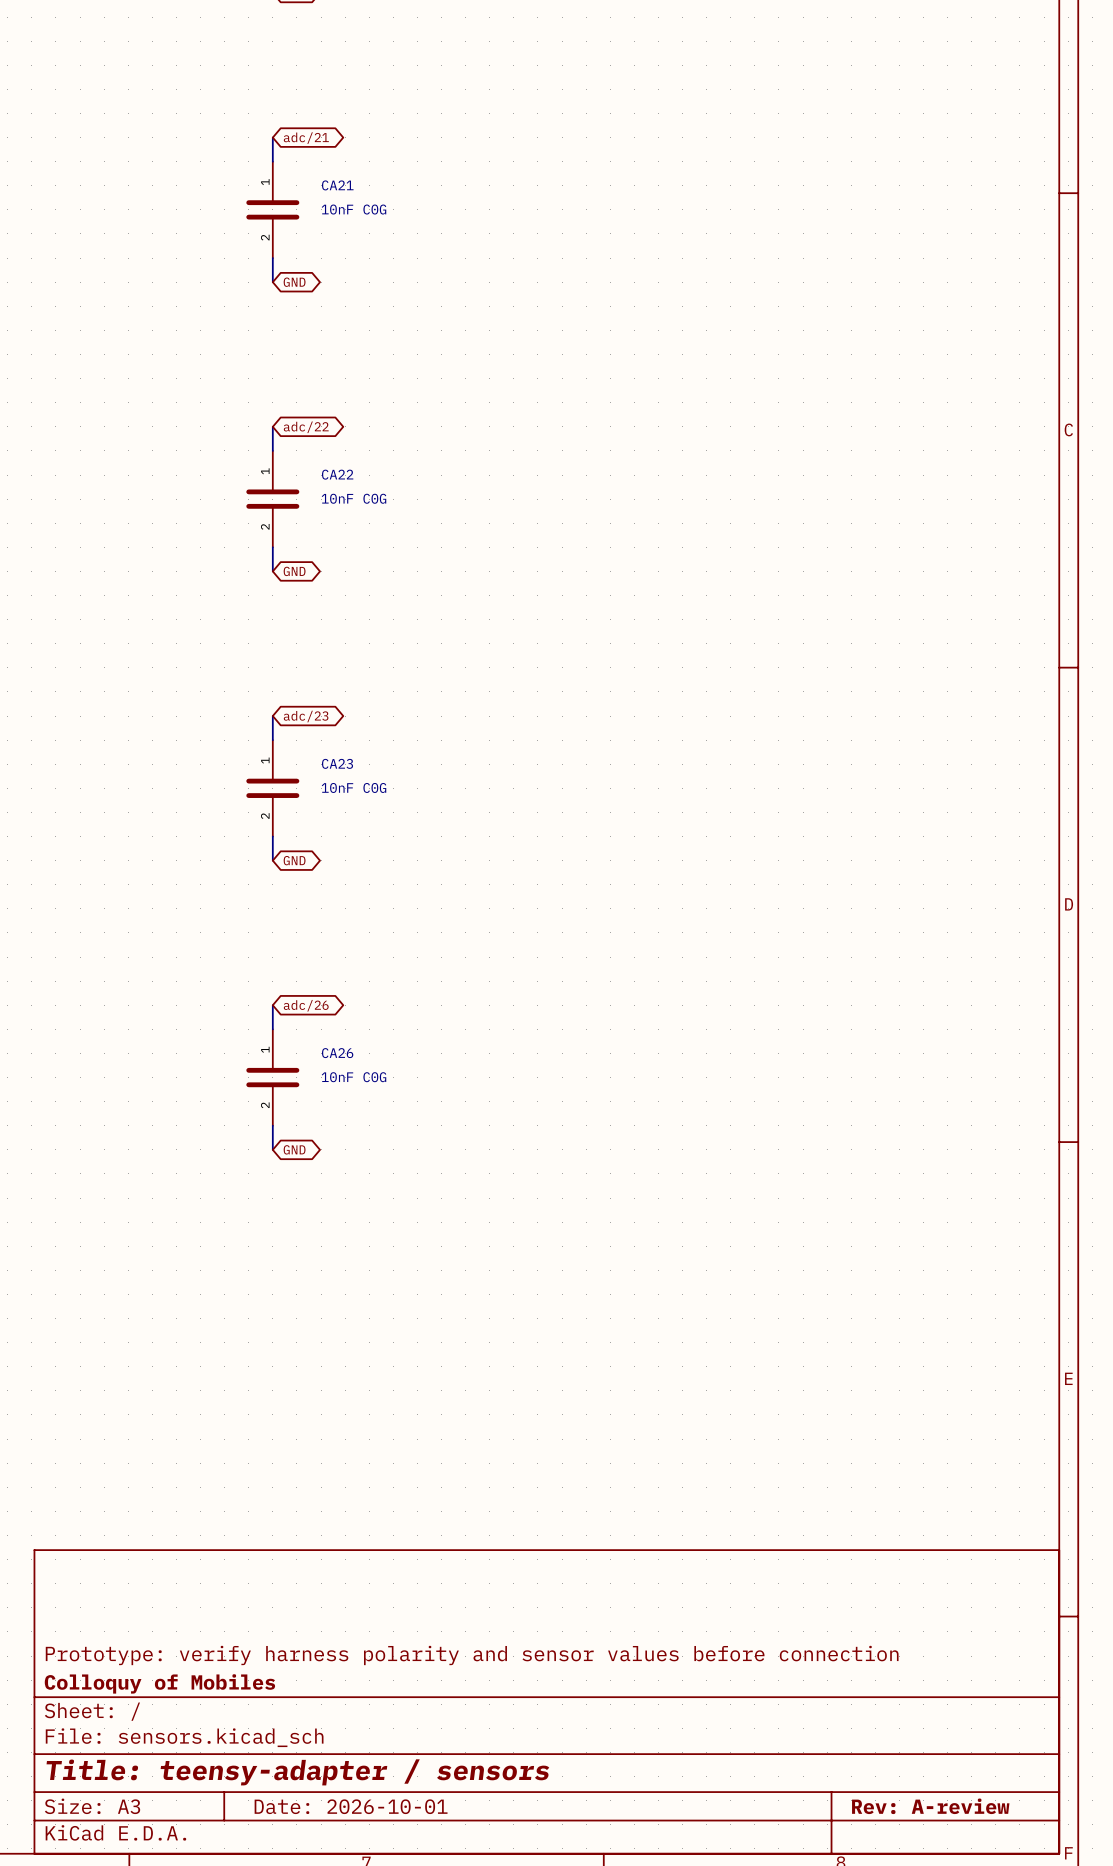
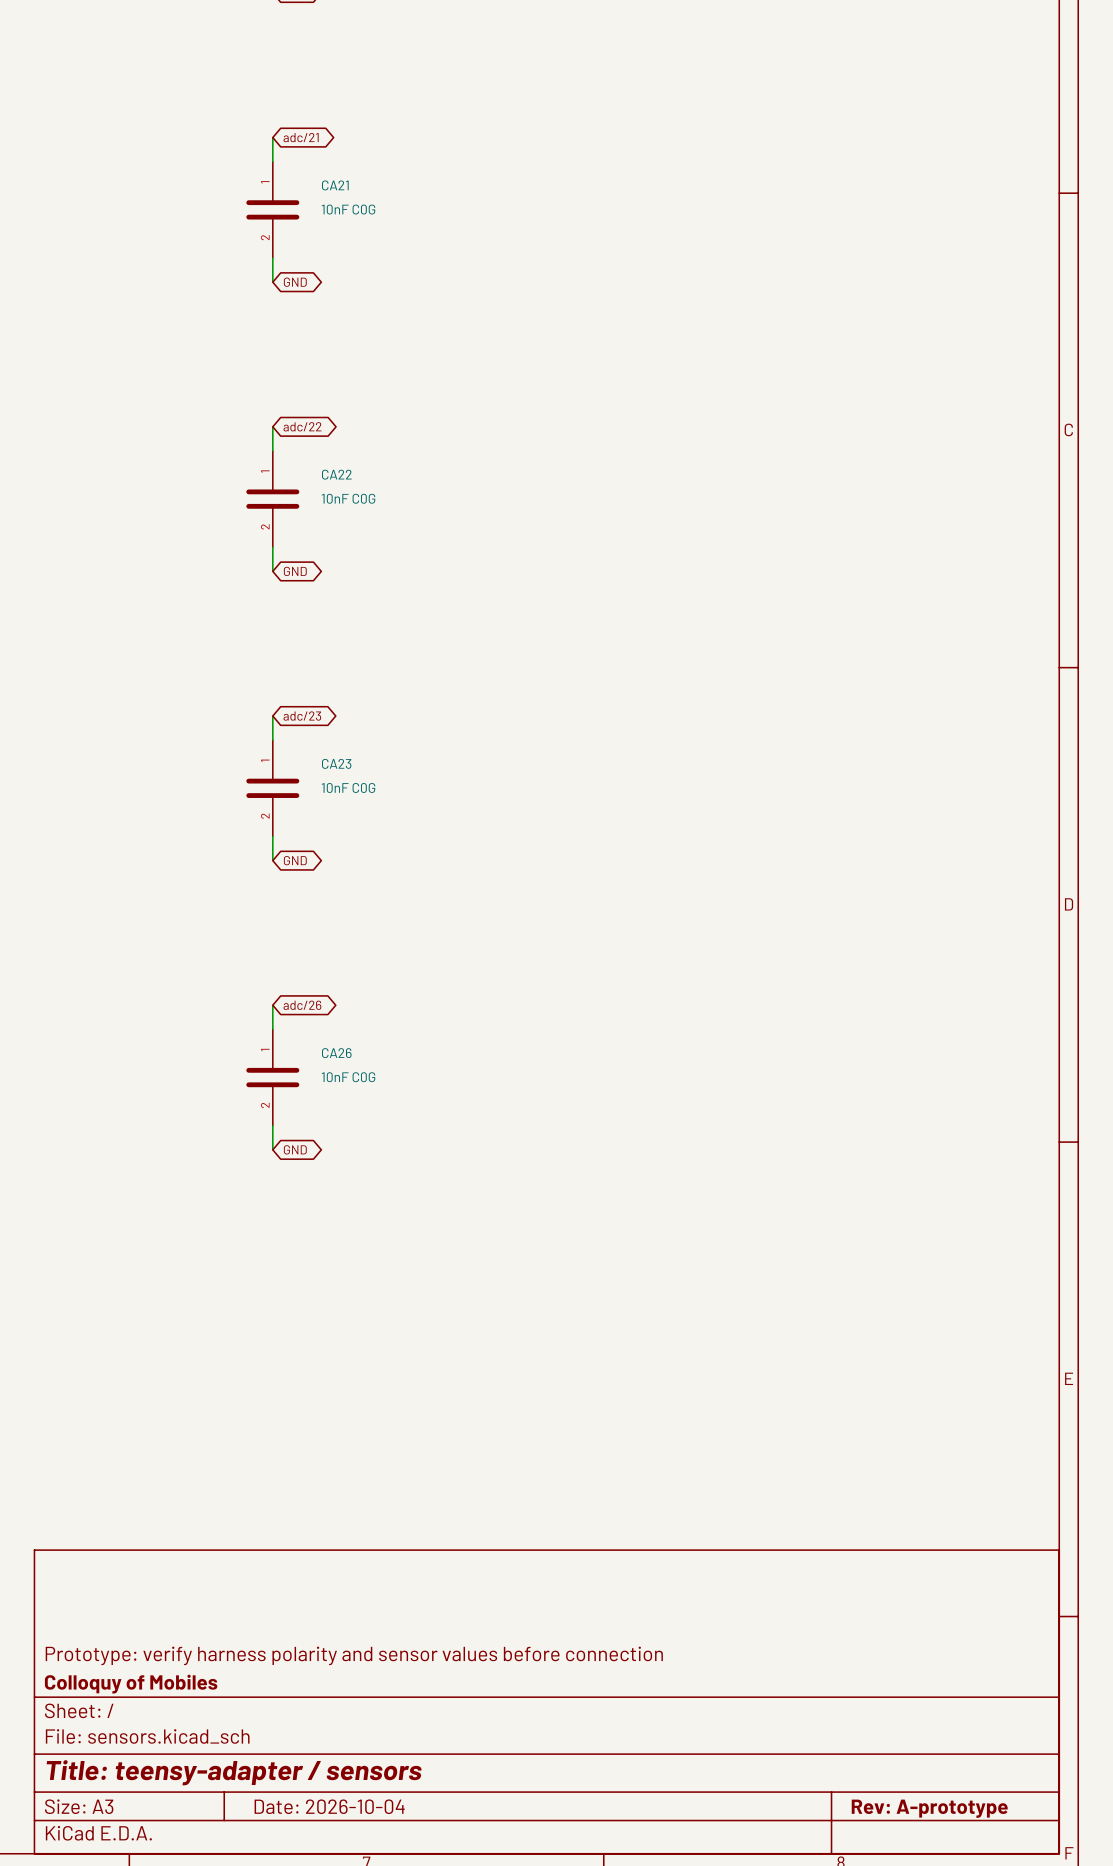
title block: Date: 2026-10-01 (351, 1806) -> Date: 2026-10-04 (329, 1806)
title block: Rev: A-review (930, 1806) -> Rev: A-prototype (929, 1808)

